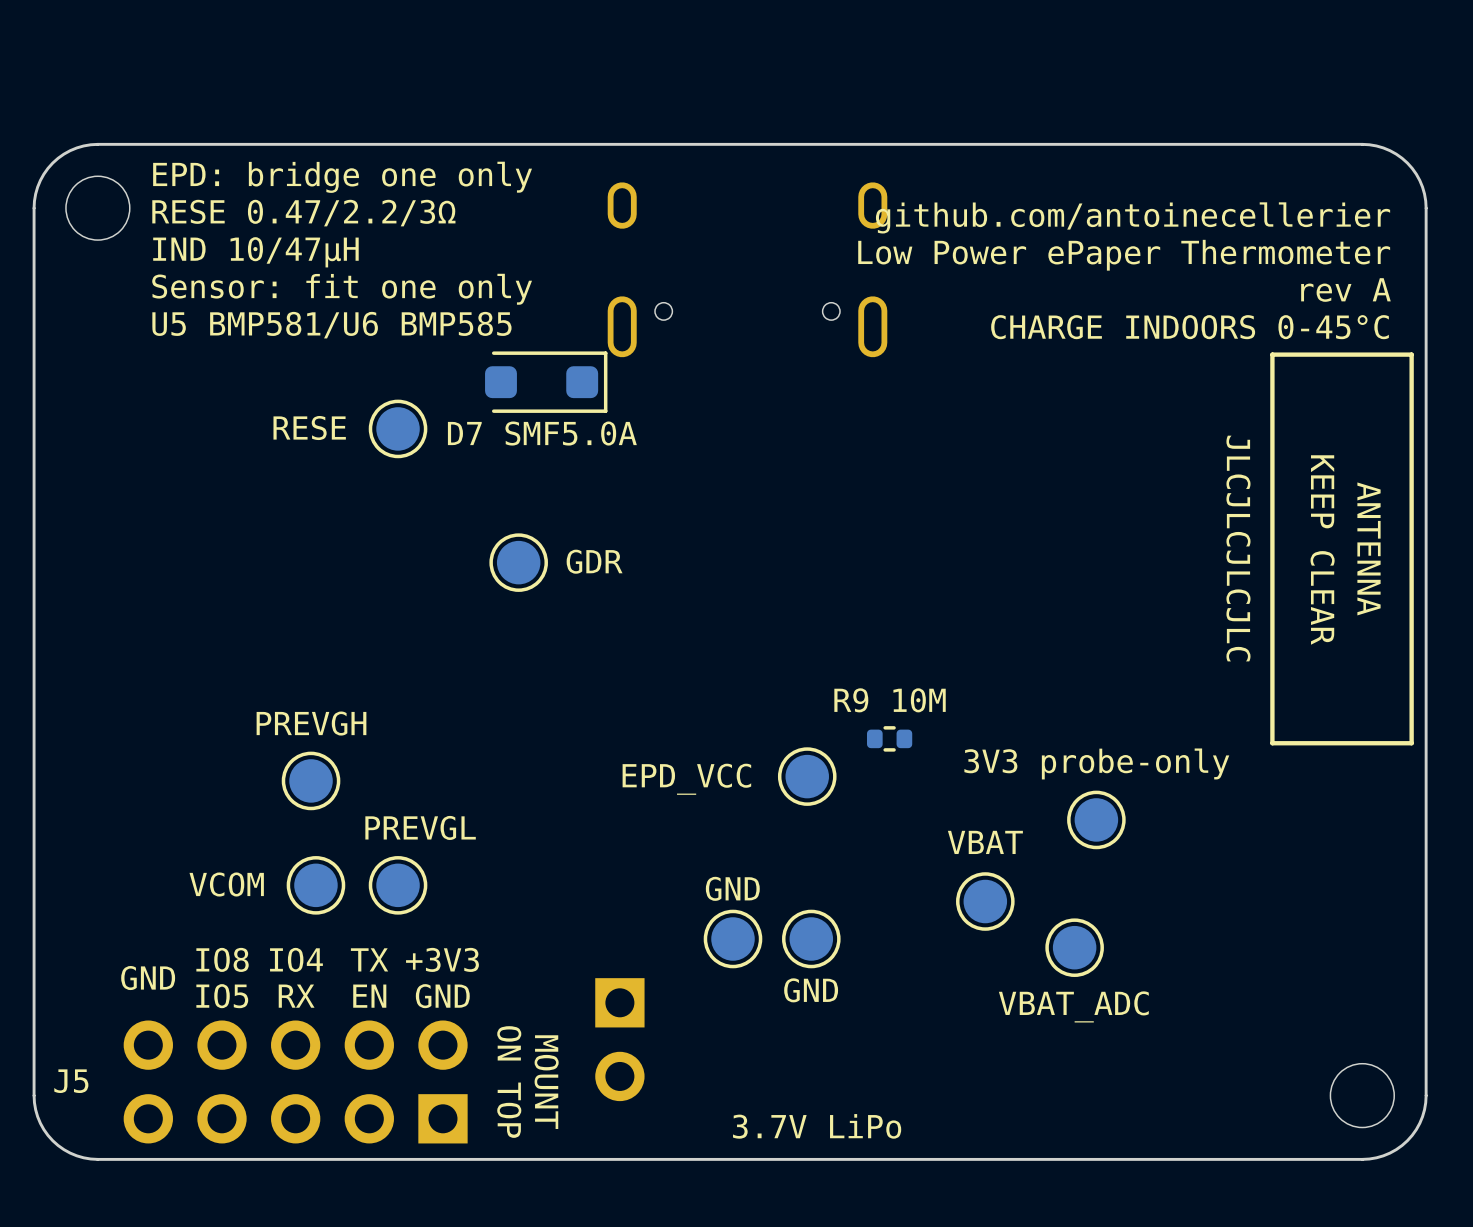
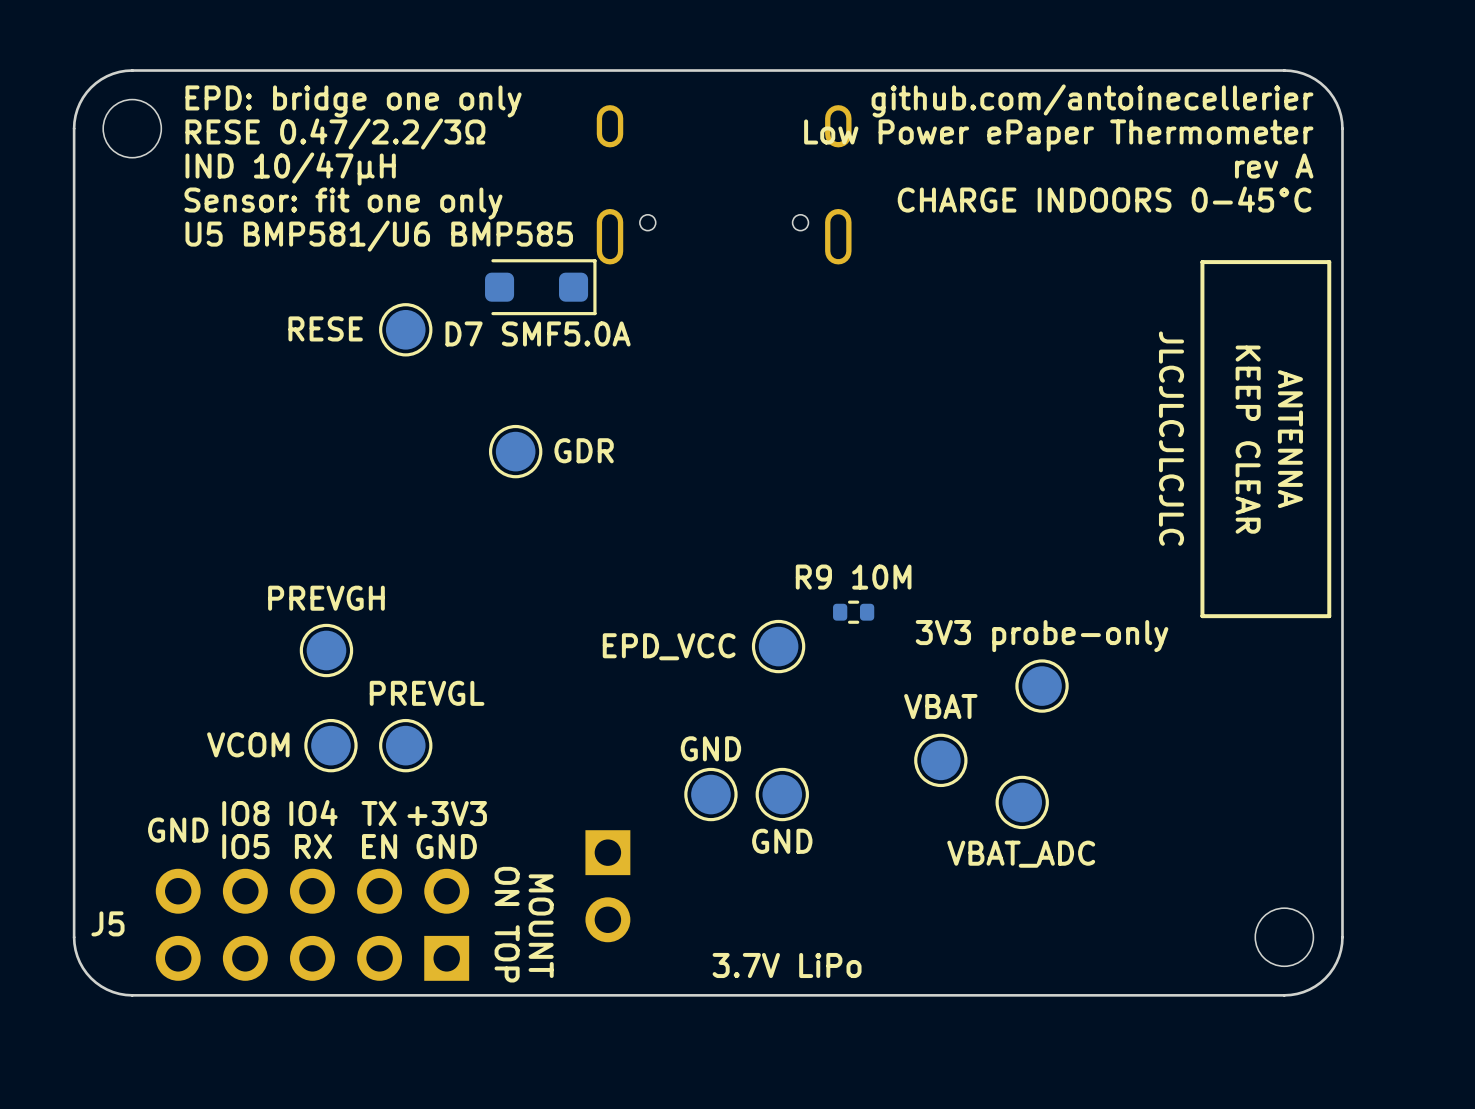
text: none -> github.com/antoinecellerier (1092, 100)
text: github.com/antoinecellerier (1133, 217) -> Low Power ePaper Thermometer (1058, 135)
text: Low Power ePaper Thermometer (1124, 255) -> rev A (1274, 166)
text: rev A (1345, 290) -> CHARGE INDOORS 0-45°C (1104, 199)
text: CHARGE INDOORS 0-45°C (1189, 327) -> none

